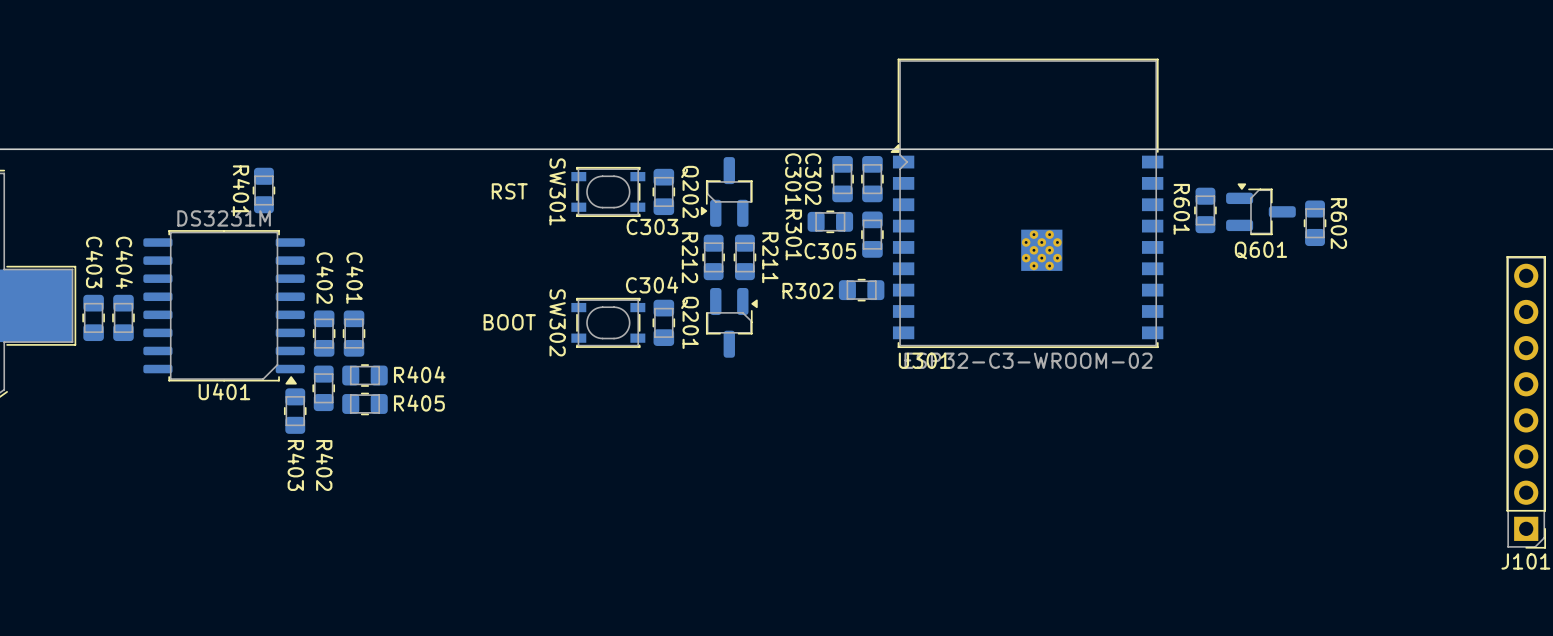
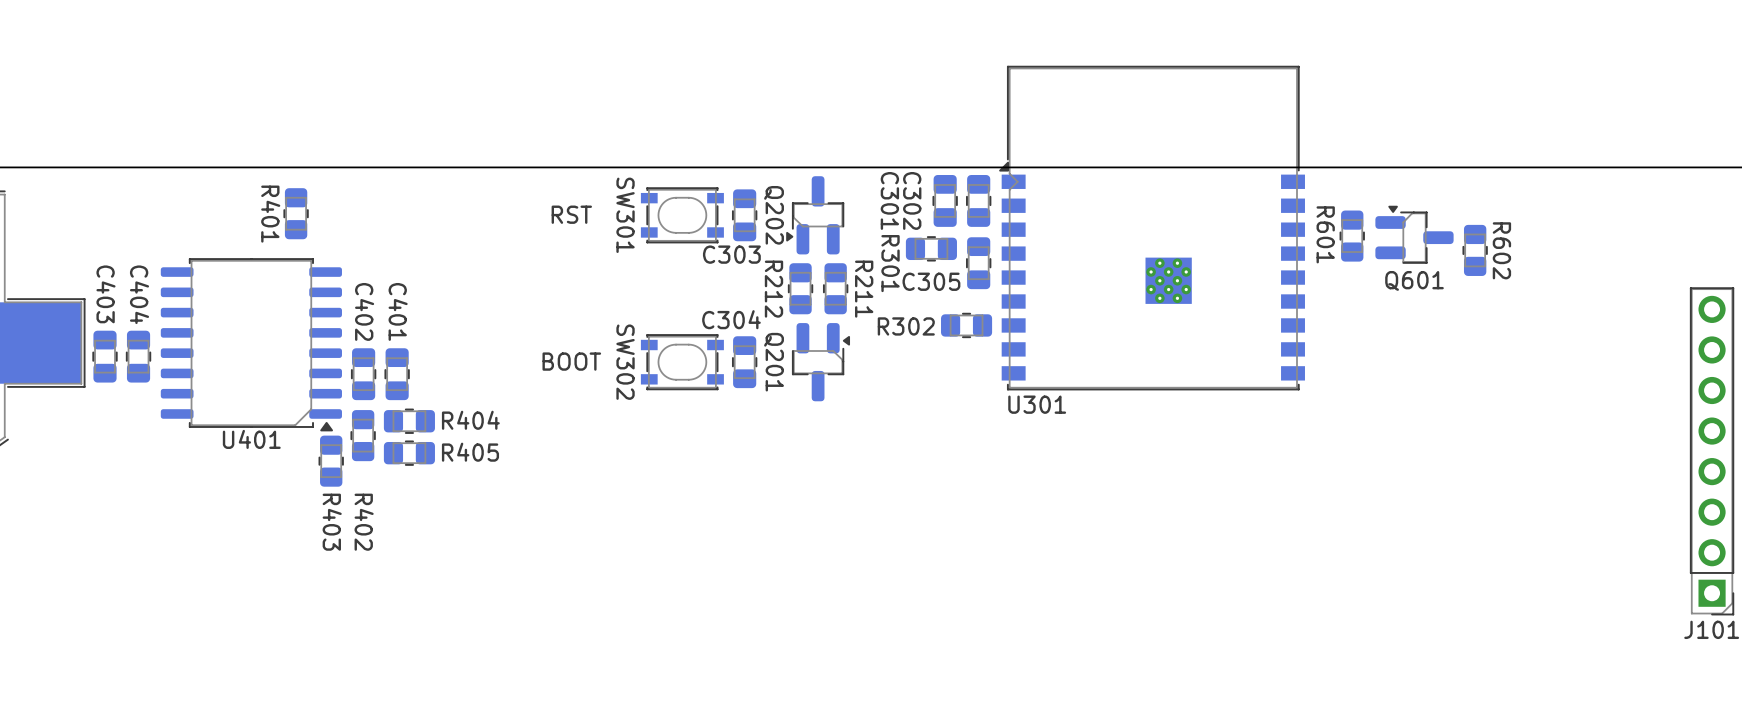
U401 value: DS3231M (224, 218) -> none
U301 value: ESP32-C3-WROOM-02 (1028, 360) -> none

